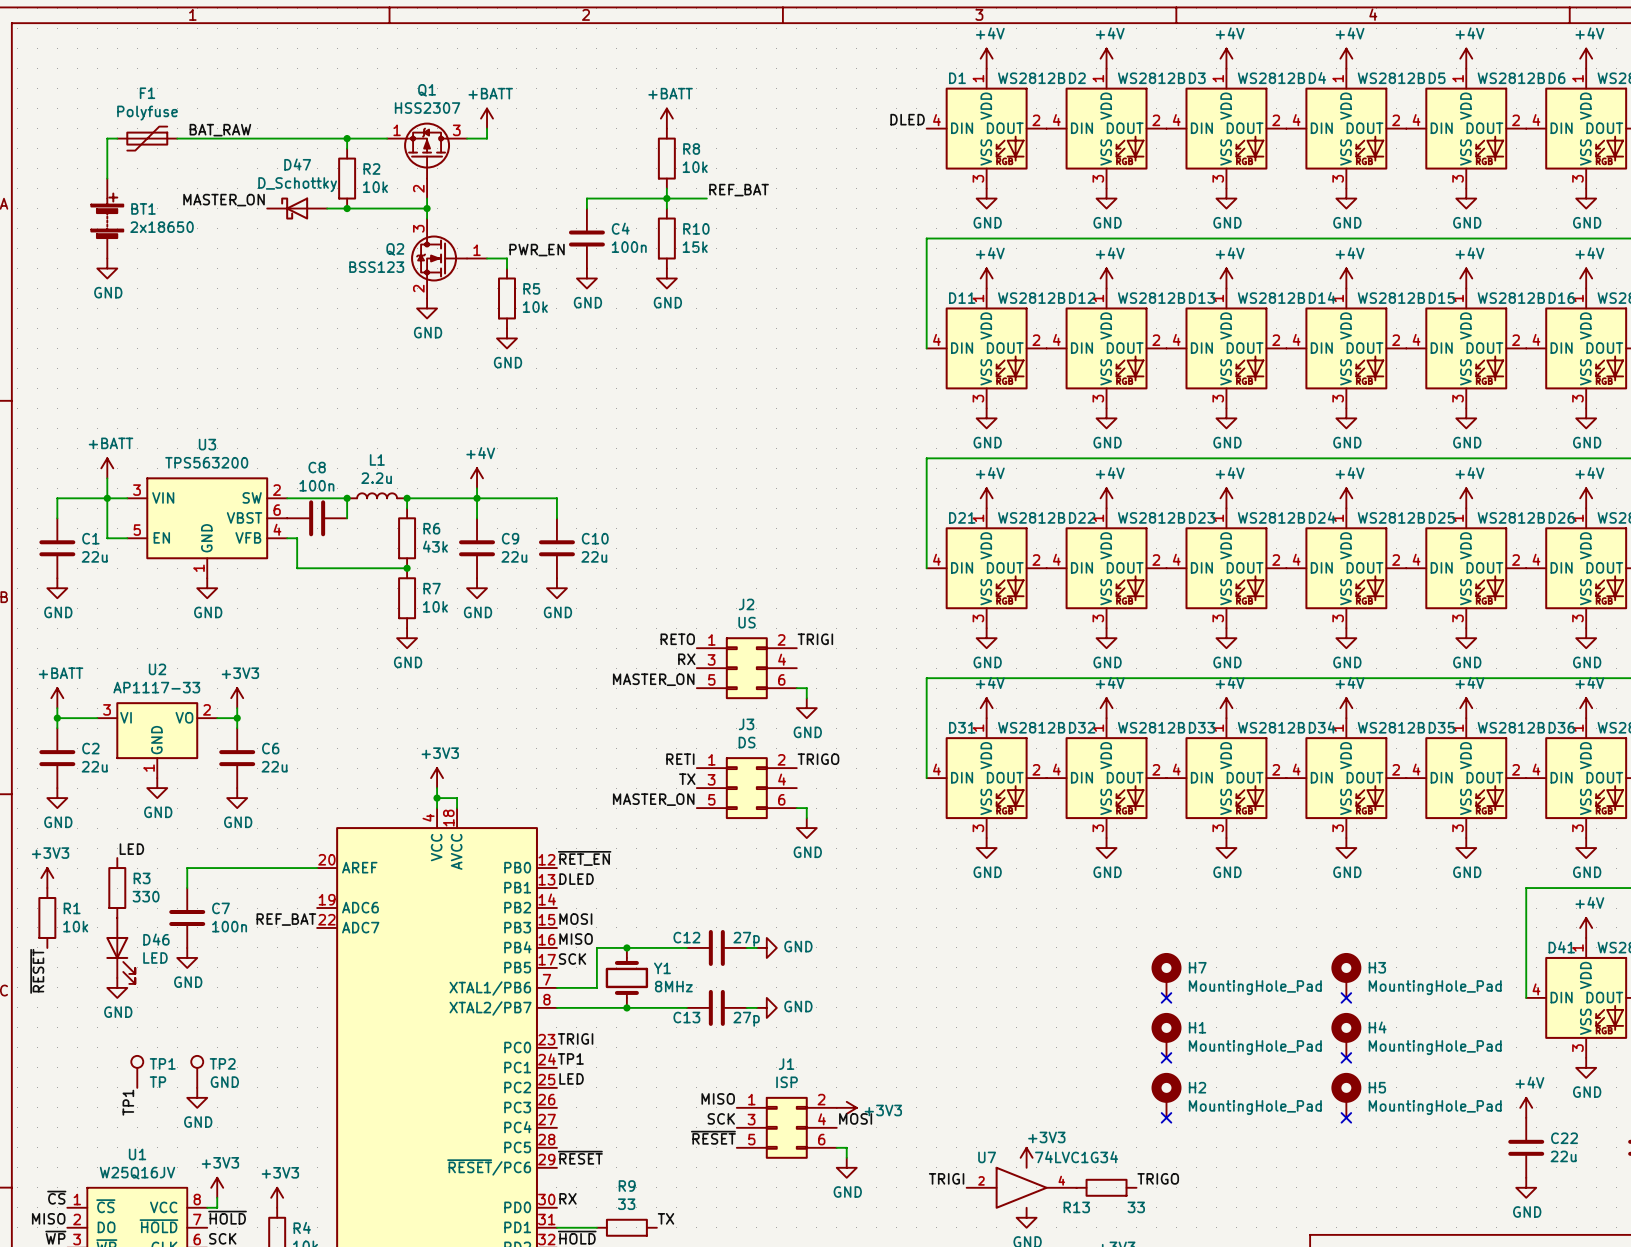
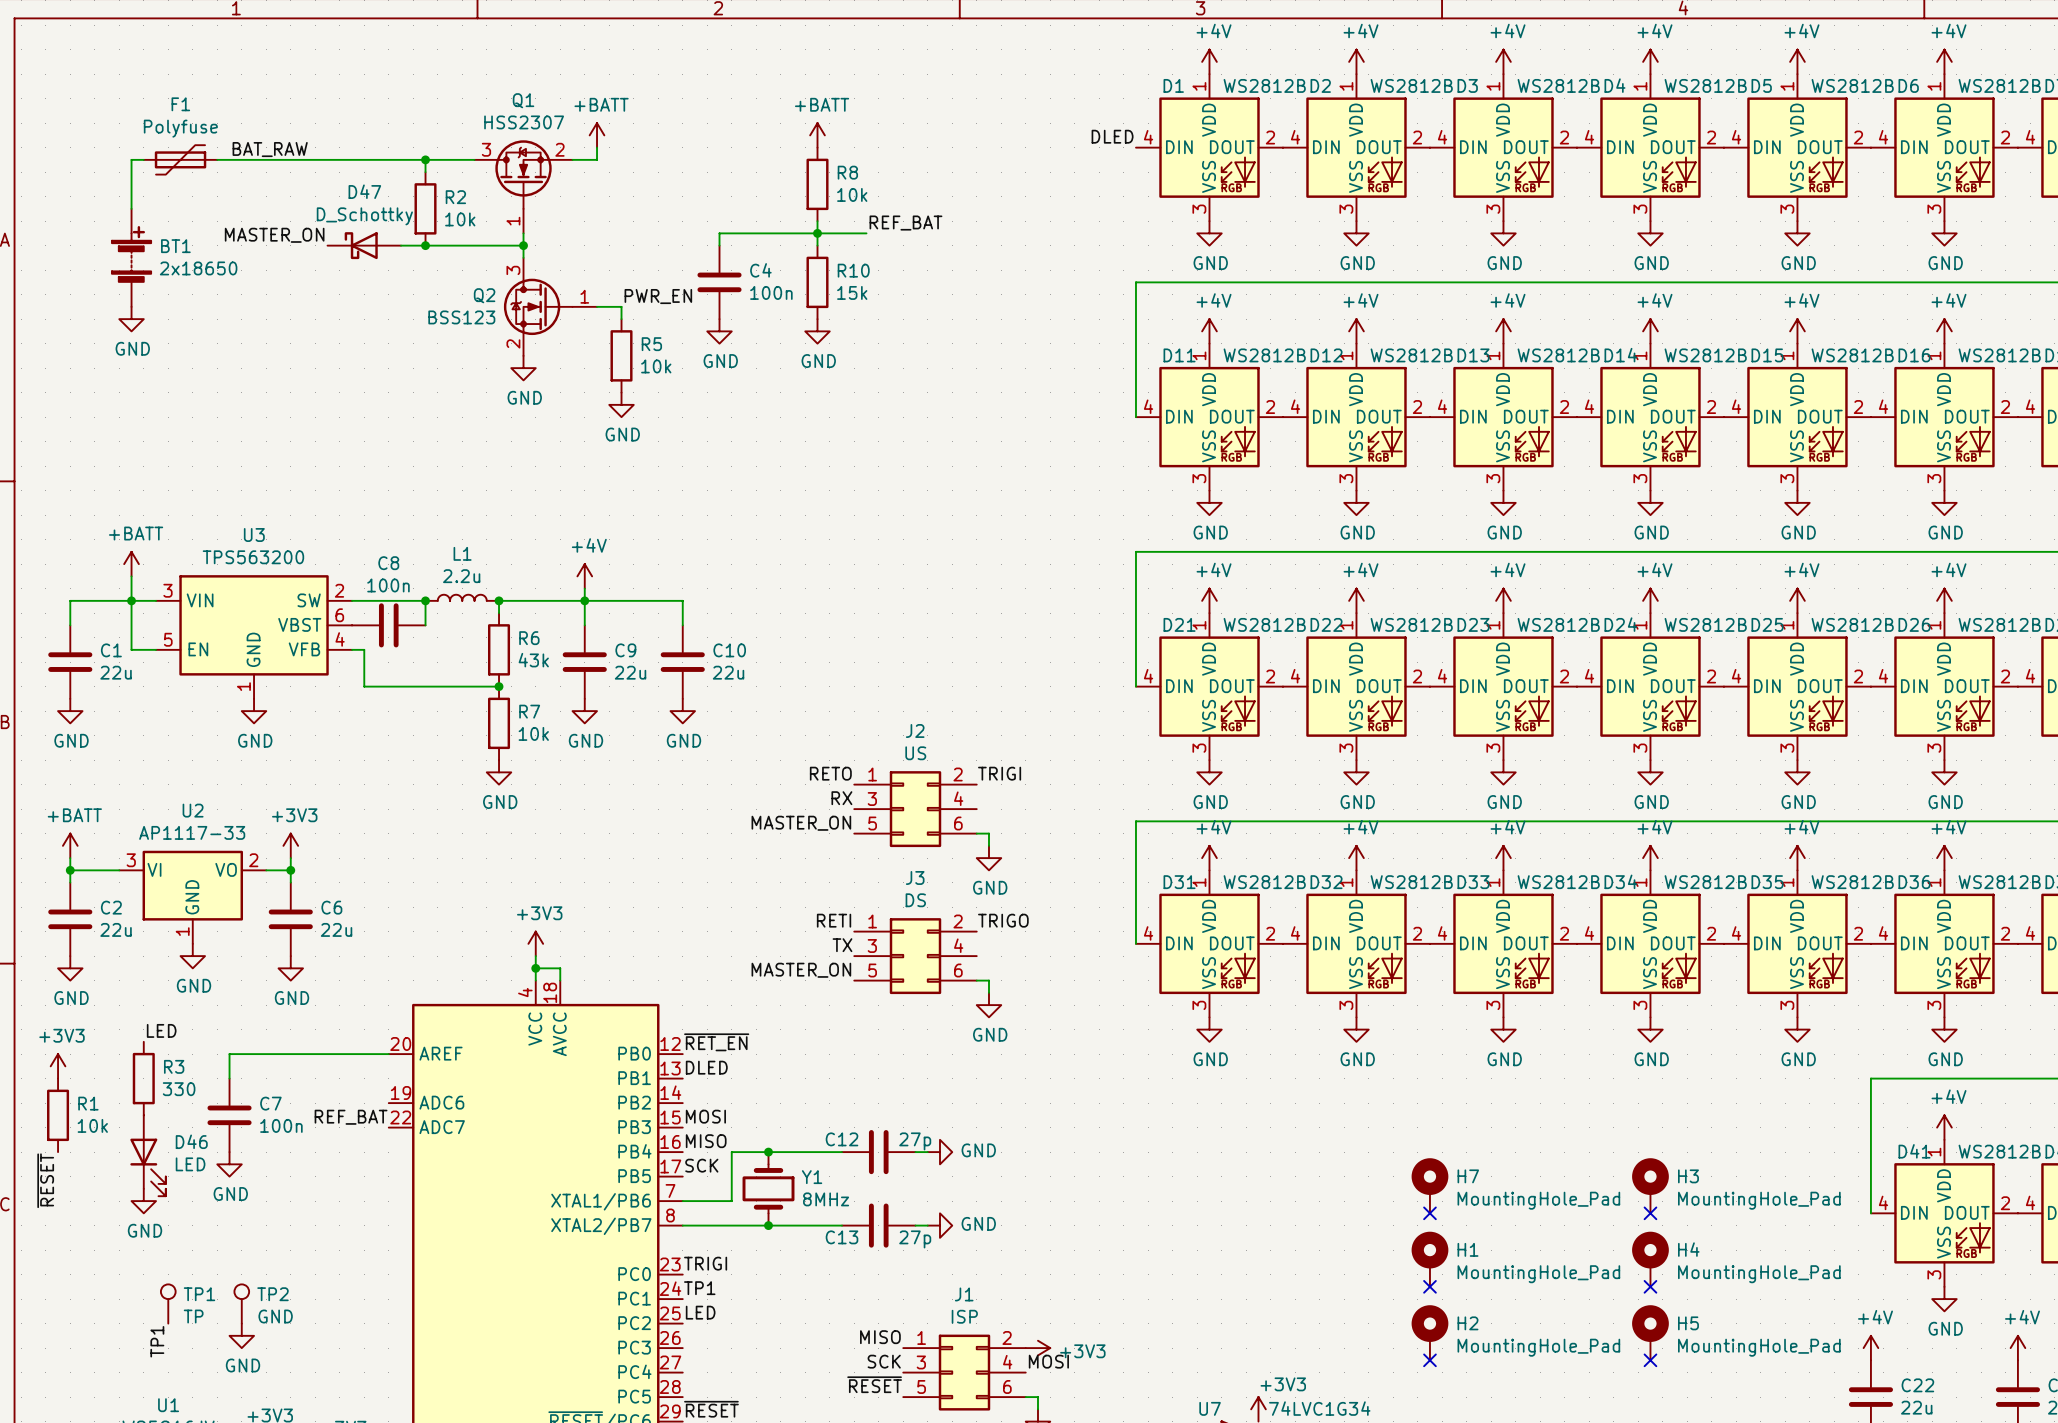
Q1 symbol: [387, 122, 468, 199] -> [474, 140, 573, 234]

